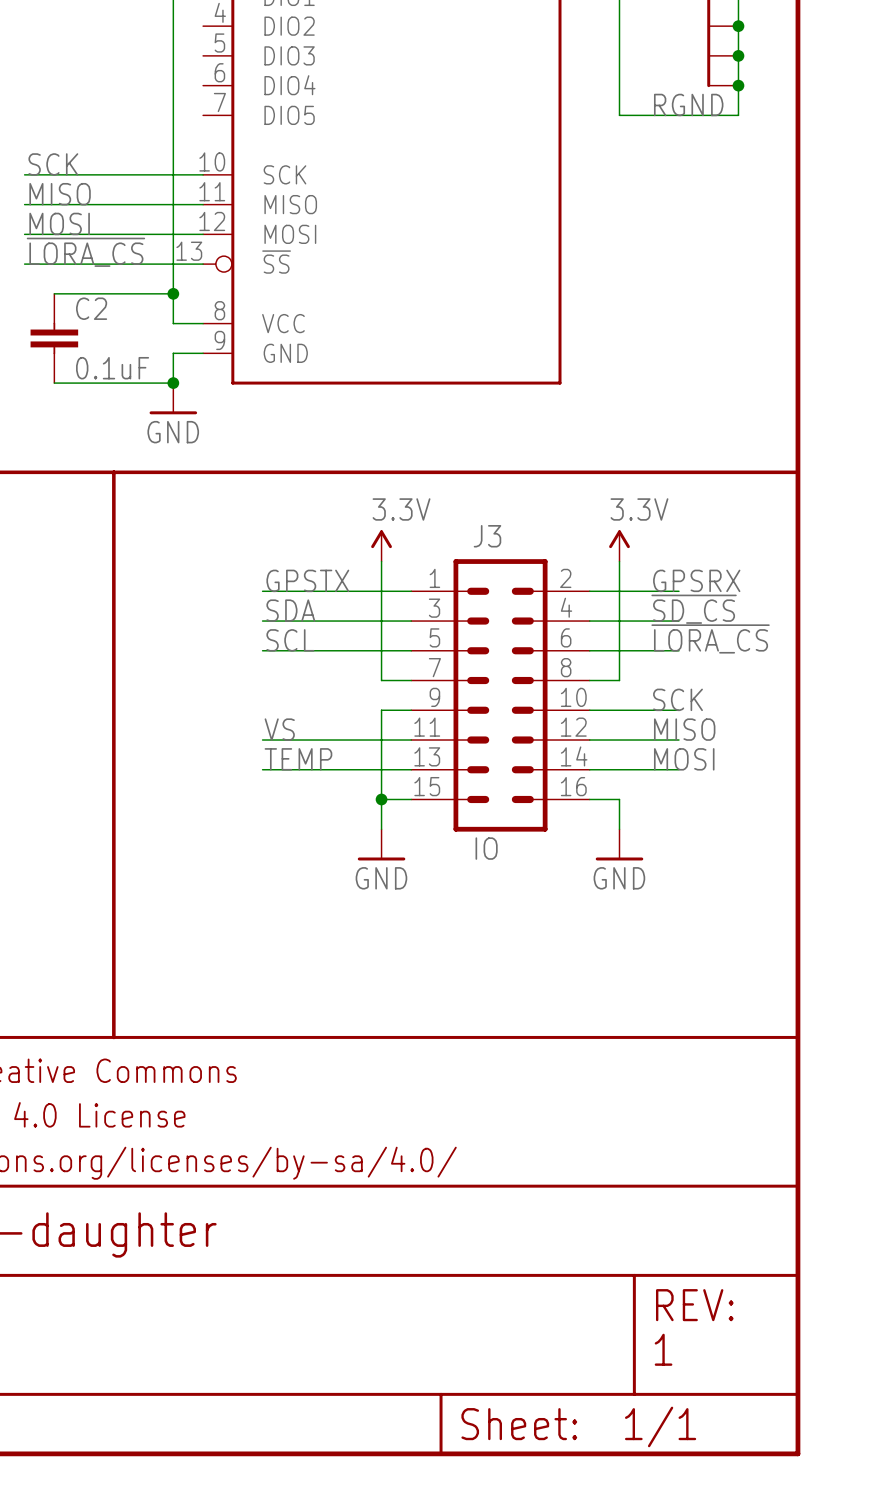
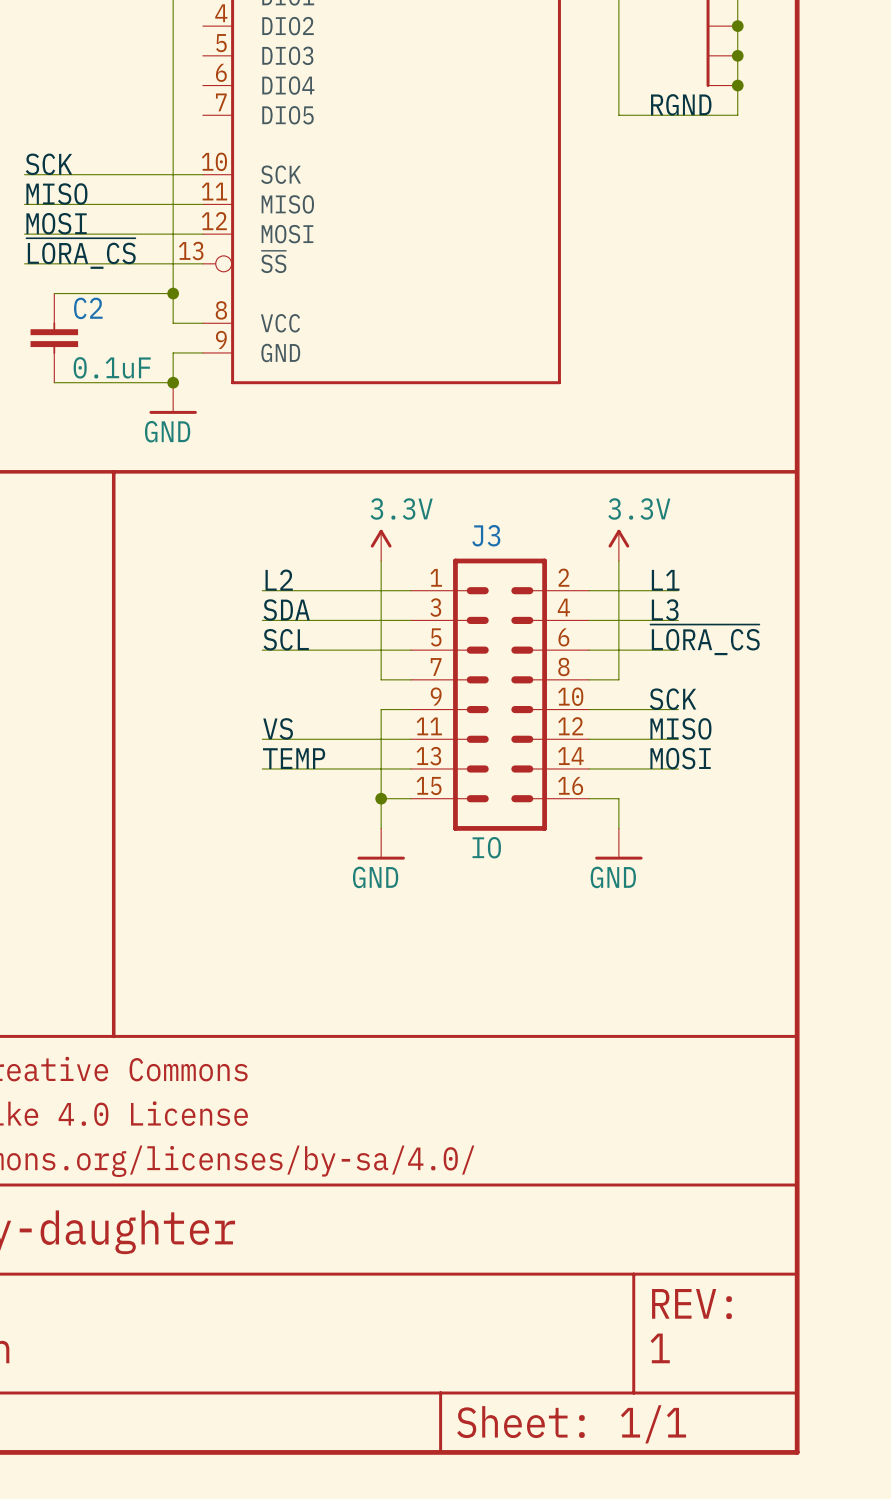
label: GPSTX (307, 580) -> L2 (279, 580)
label: GPSRX (696, 580) -> L1 (665, 580)
label: ~{SD_CS} (694, 609) -> L3 (665, 610)

